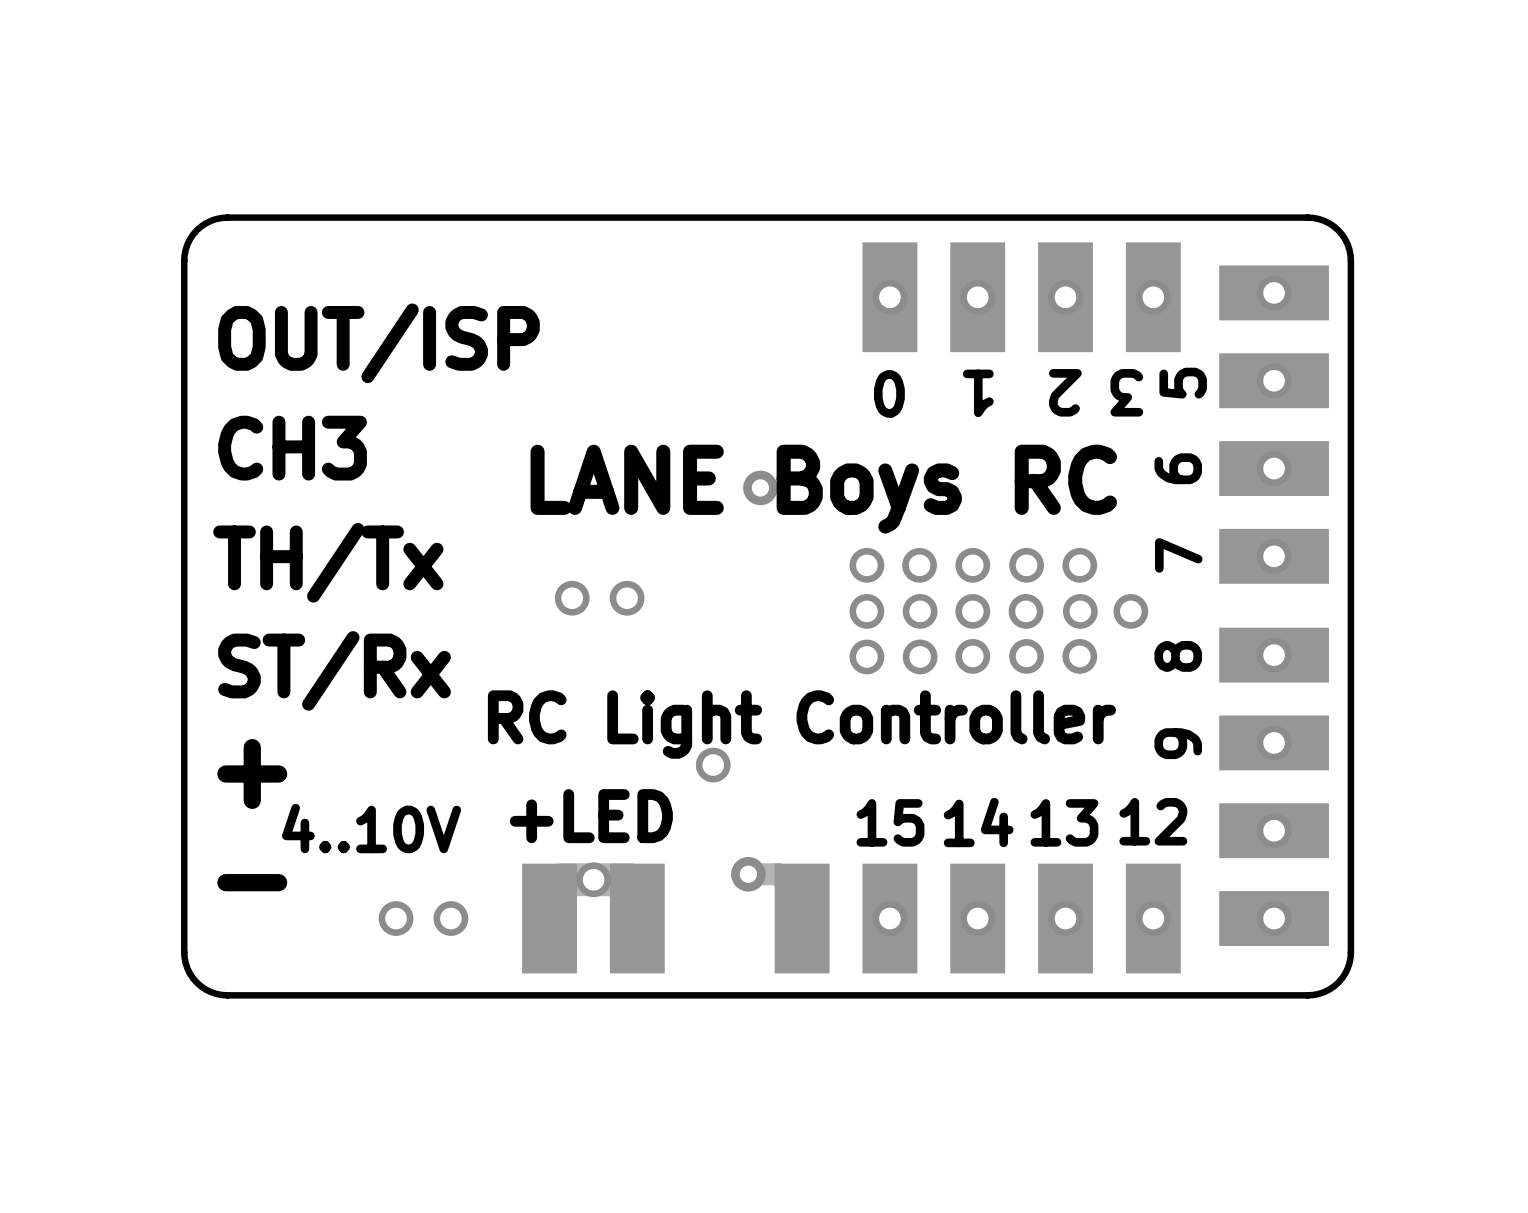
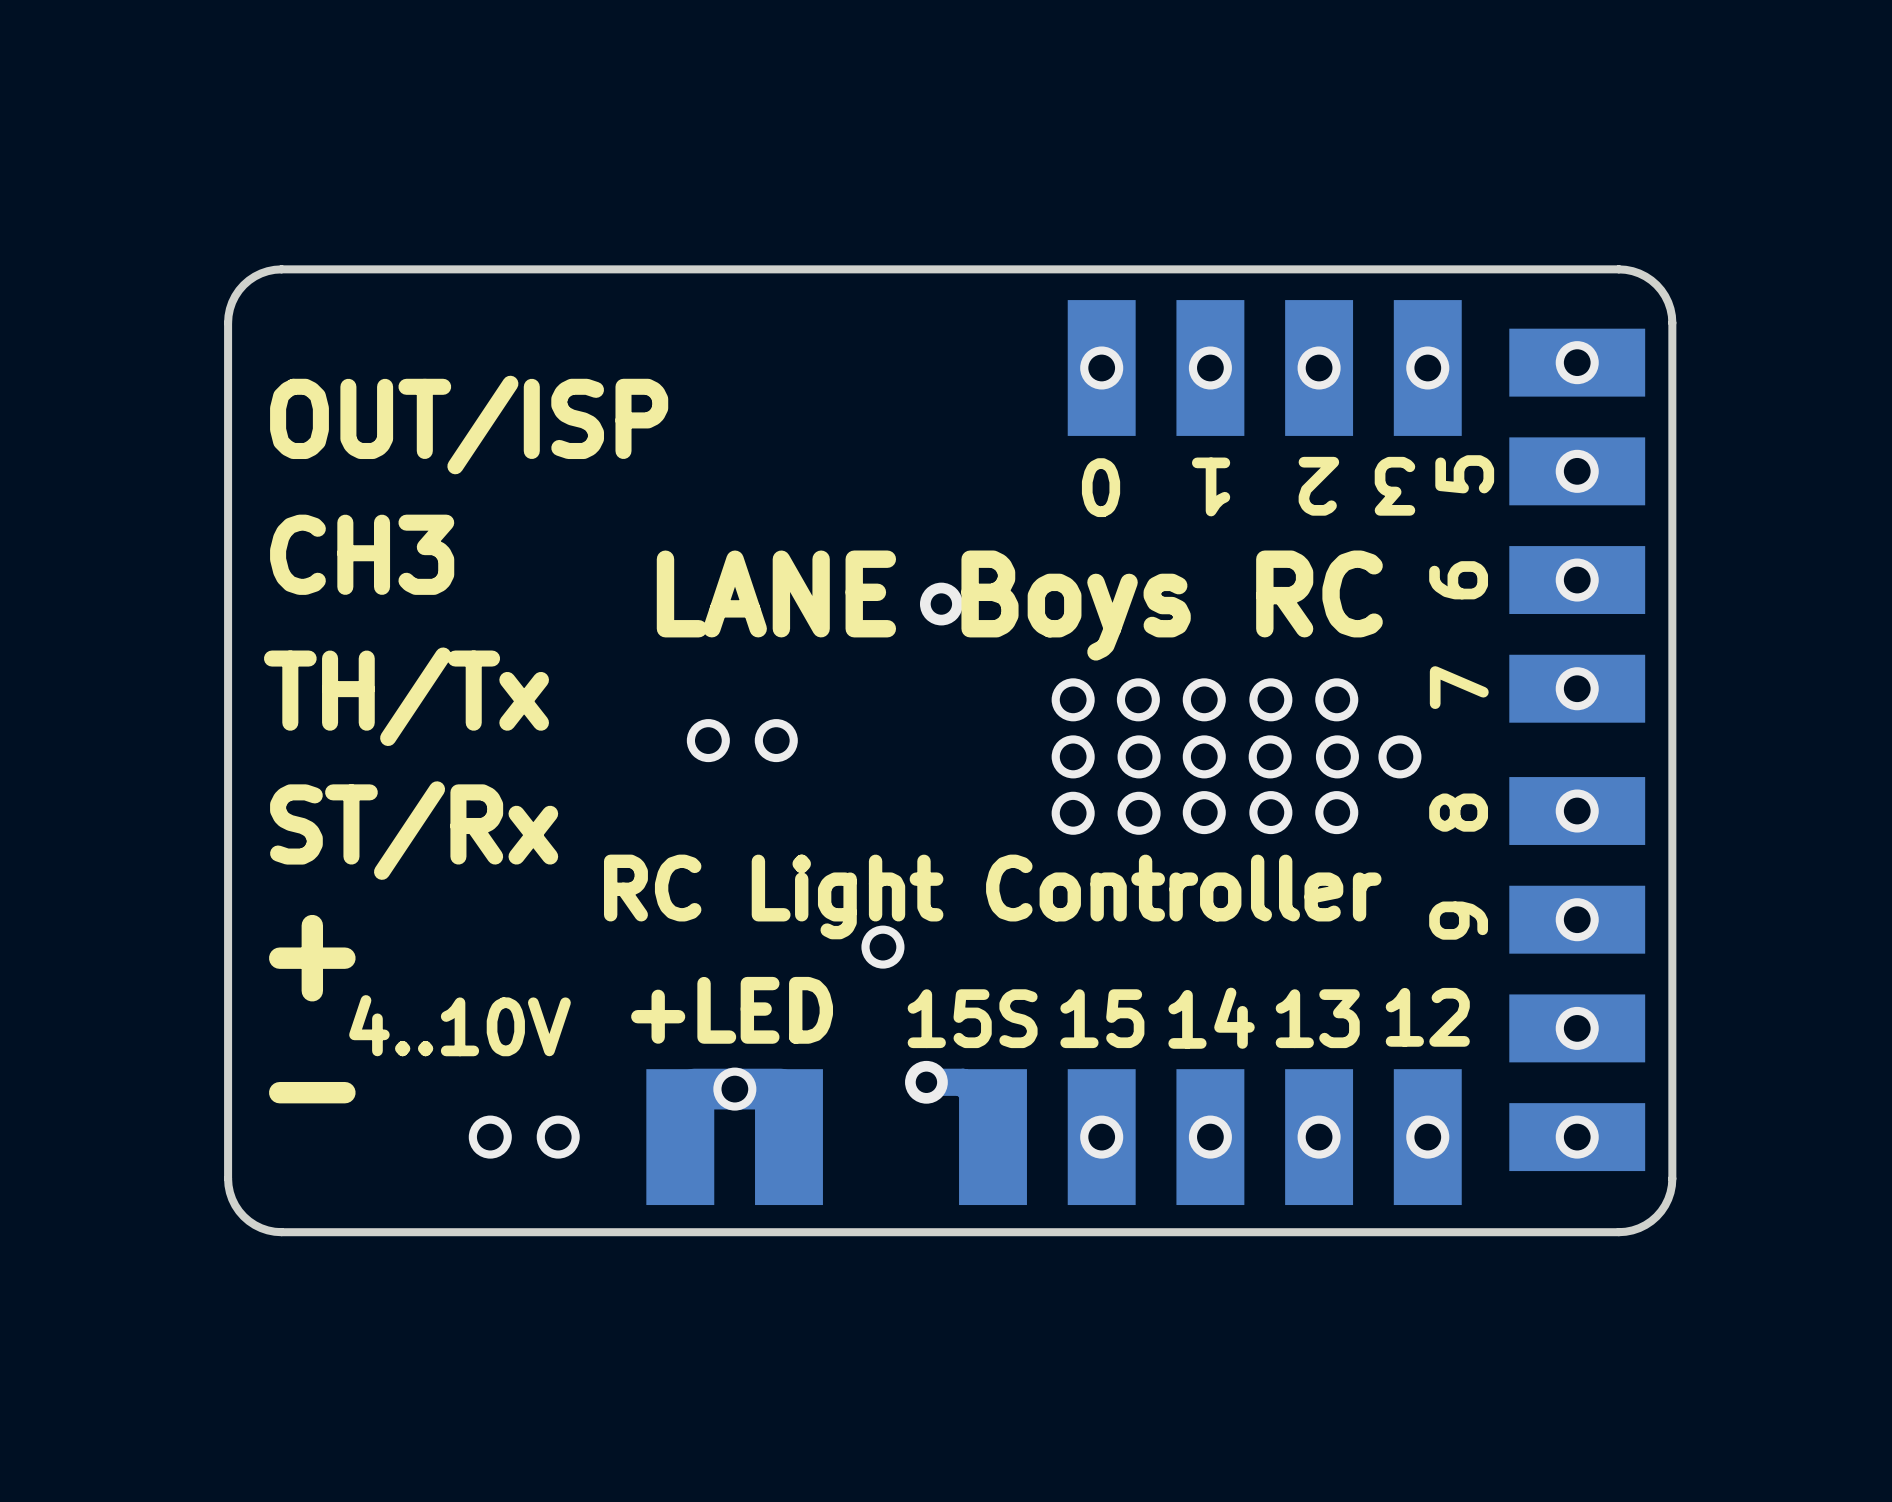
text: none -> 15S (972, 1018)

